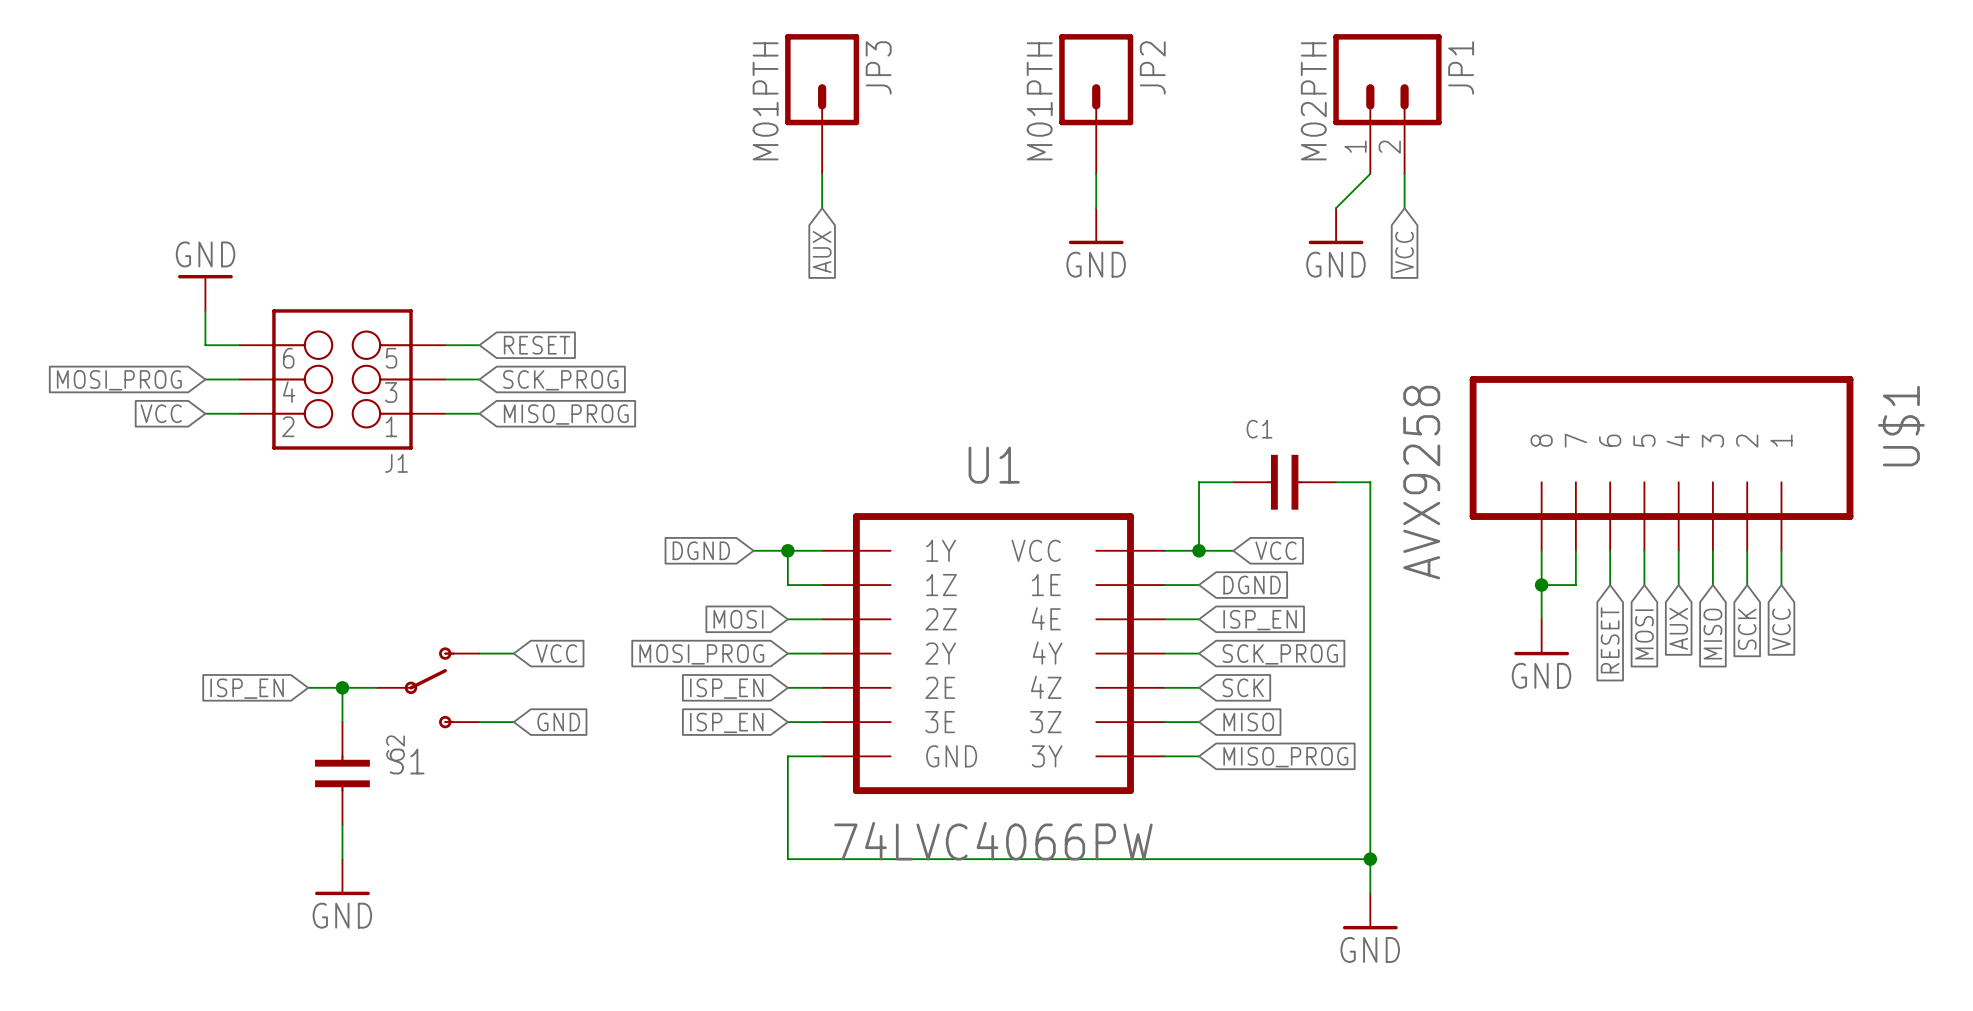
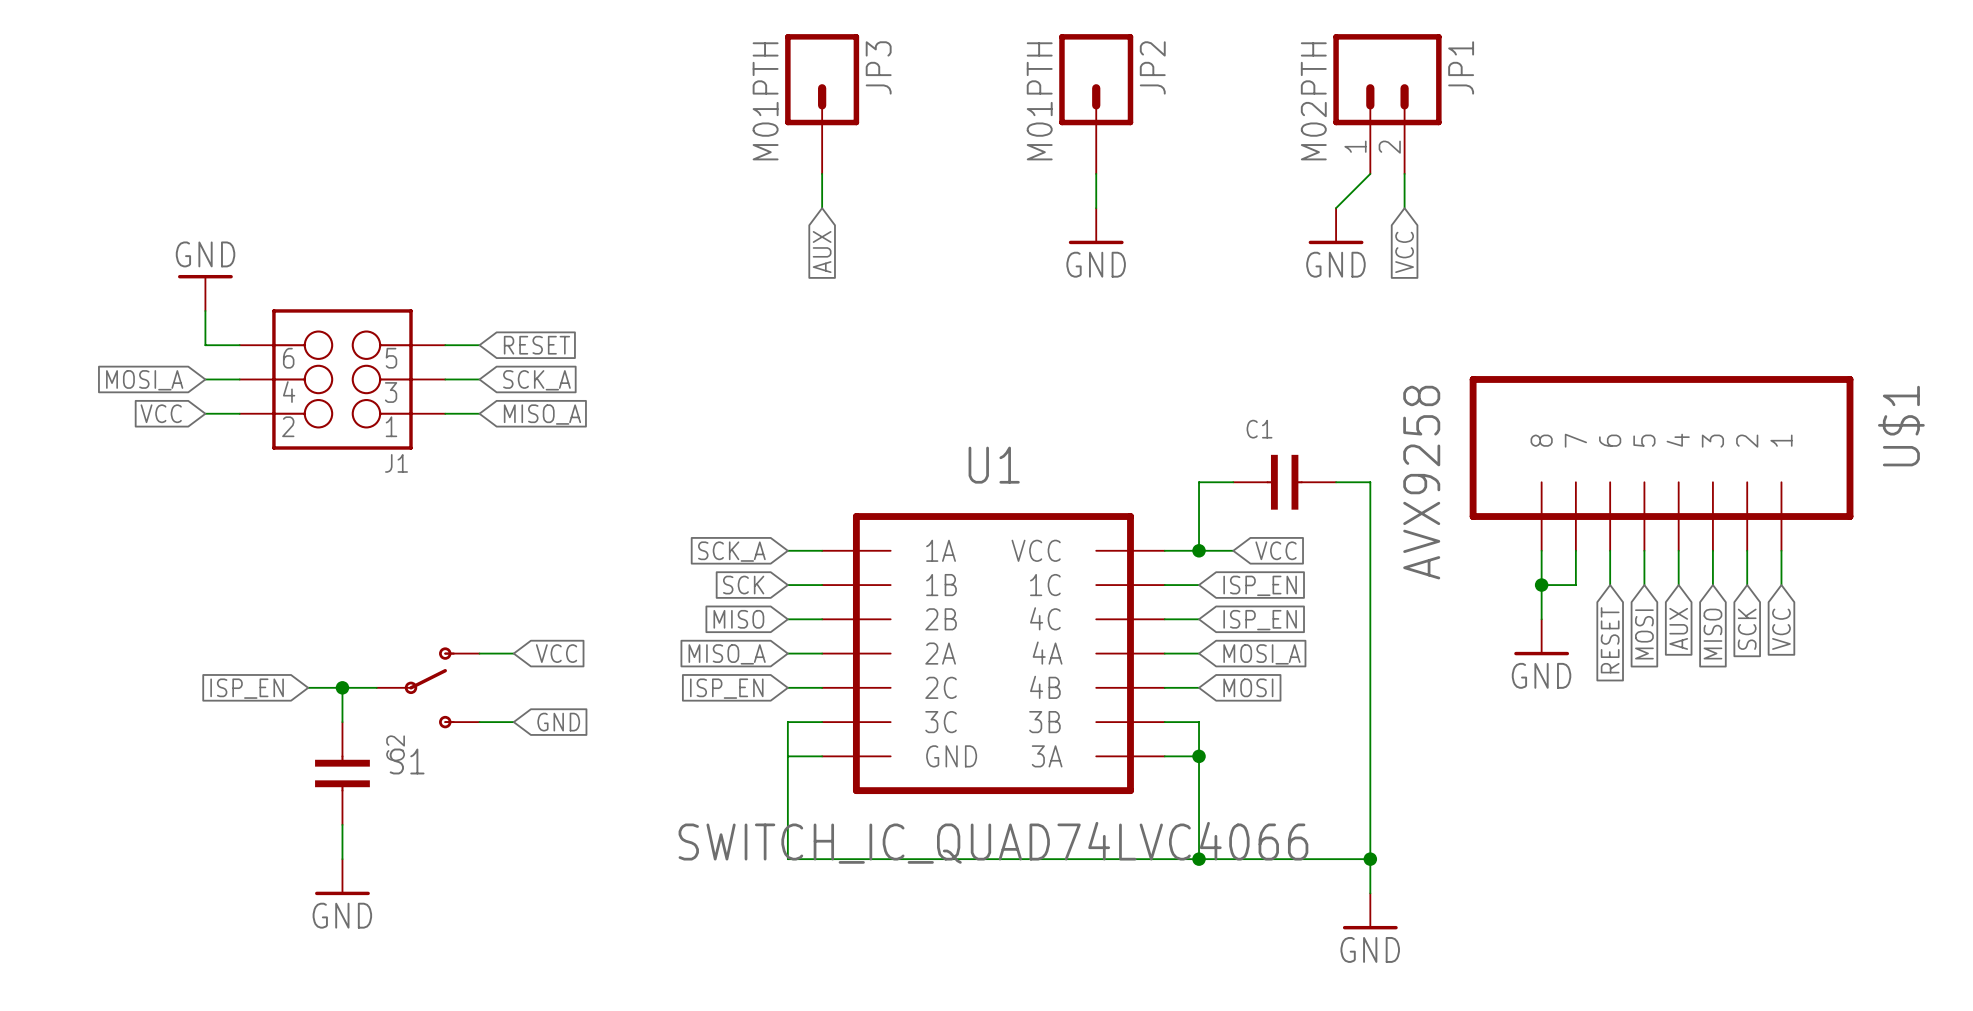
global label: MOSI_PROG (119, 380) -> MOSI_A (144, 380)
global label: SCK_PROG (560, 380) -> SCK_A (536, 380)
global label: MISO_PROG (566, 414) -> MISO_A (542, 414)
U1 symbol: [822, 513, 1165, 795] -> [822, 513, 1165, 795]
global label: DGND (701, 550) -> none
wire: (753, 550) (787, 550) (787, 585) -> none
junction: (787, 550) -> none
global label: none -> SCK_A (731, 551)
global label: none -> SCK (743, 585)
global label: DGND (1252, 585) -> ISP_EN (1260, 585)
global label: MOSI (738, 619) -> MISO (738, 619)
global label: MOSI_PROG (701, 654) -> MISO_A (727, 654)
global label: SCK_PROG (1280, 654) -> MOSI_A (1261, 654)
global label: SCK (1243, 687) -> MOSI (1248, 687)
global label: ISP_EN (726, 722) -> none
wire: none -> (787, 722) (787, 756)
wire: none -> (1199, 722) (1199, 859)
global label: MISO (1248, 722) -> none
junction: none -> (1199, 756)
global label: MISO_PROG (1285, 757) -> none
U1 value: 74LVC4066PW (993, 841) -> SWITCH_IC_QUAD74LVC4066 (993, 842)
junction: none -> (1199, 859)

